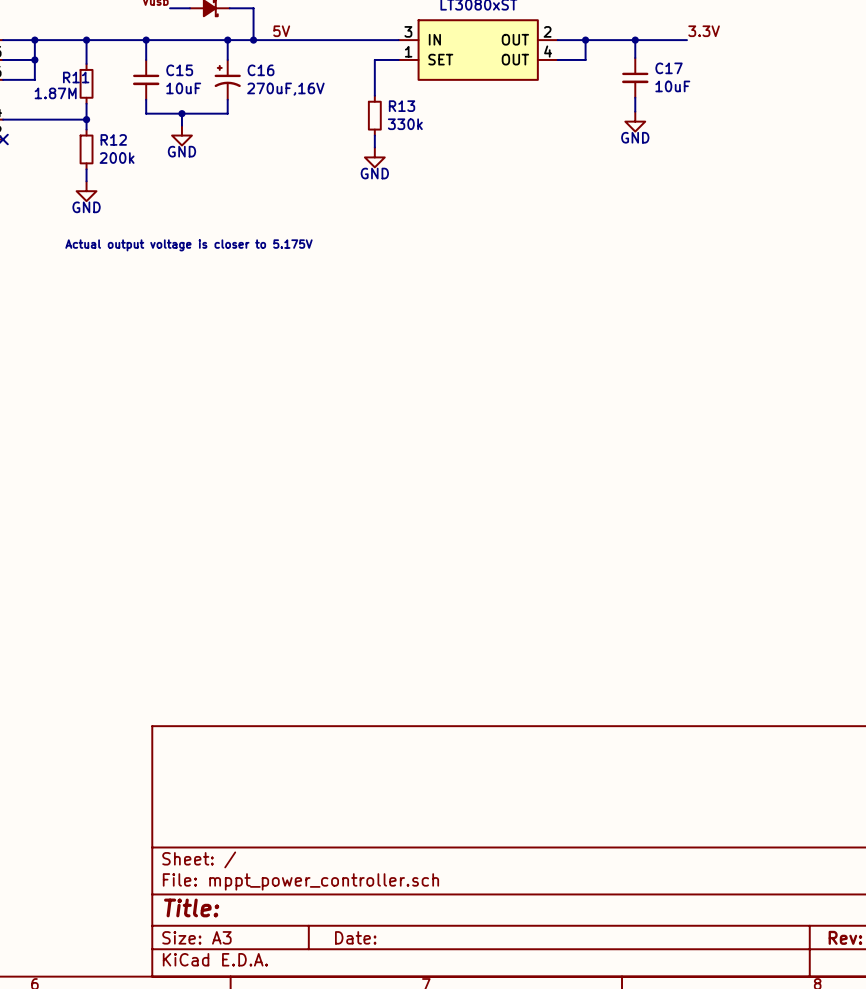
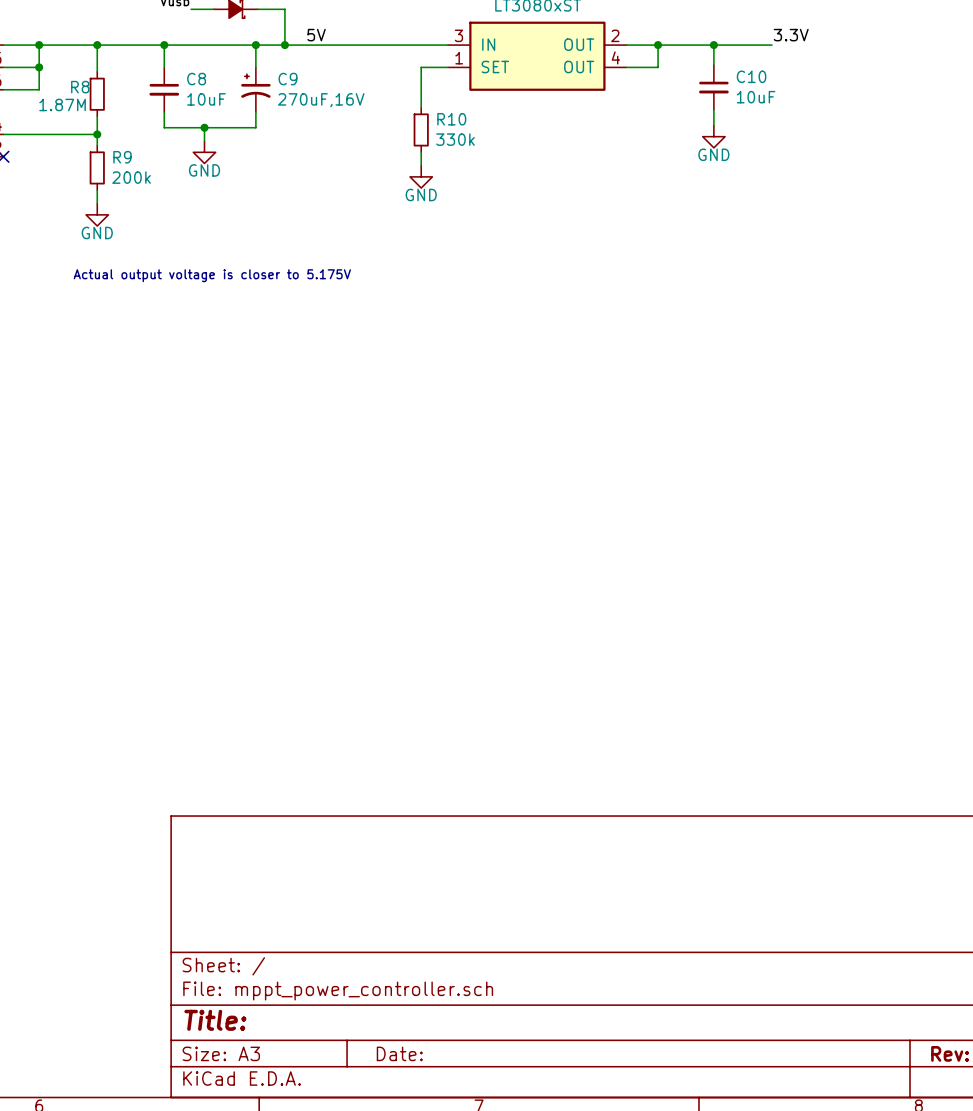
C17 name: C17 (669, 68) -> C10 (751, 76)
C15 name: C15 (179, 70) -> C8 (196, 79)
C16 name: C16 (261, 70) -> C9 (288, 79)
R11 name: R11 (76, 77) -> R8 (80, 87)
R13 name: R13 (402, 106) -> R10 (451, 119)
R12 name: R12 (113, 139) -> R9 (122, 157)

